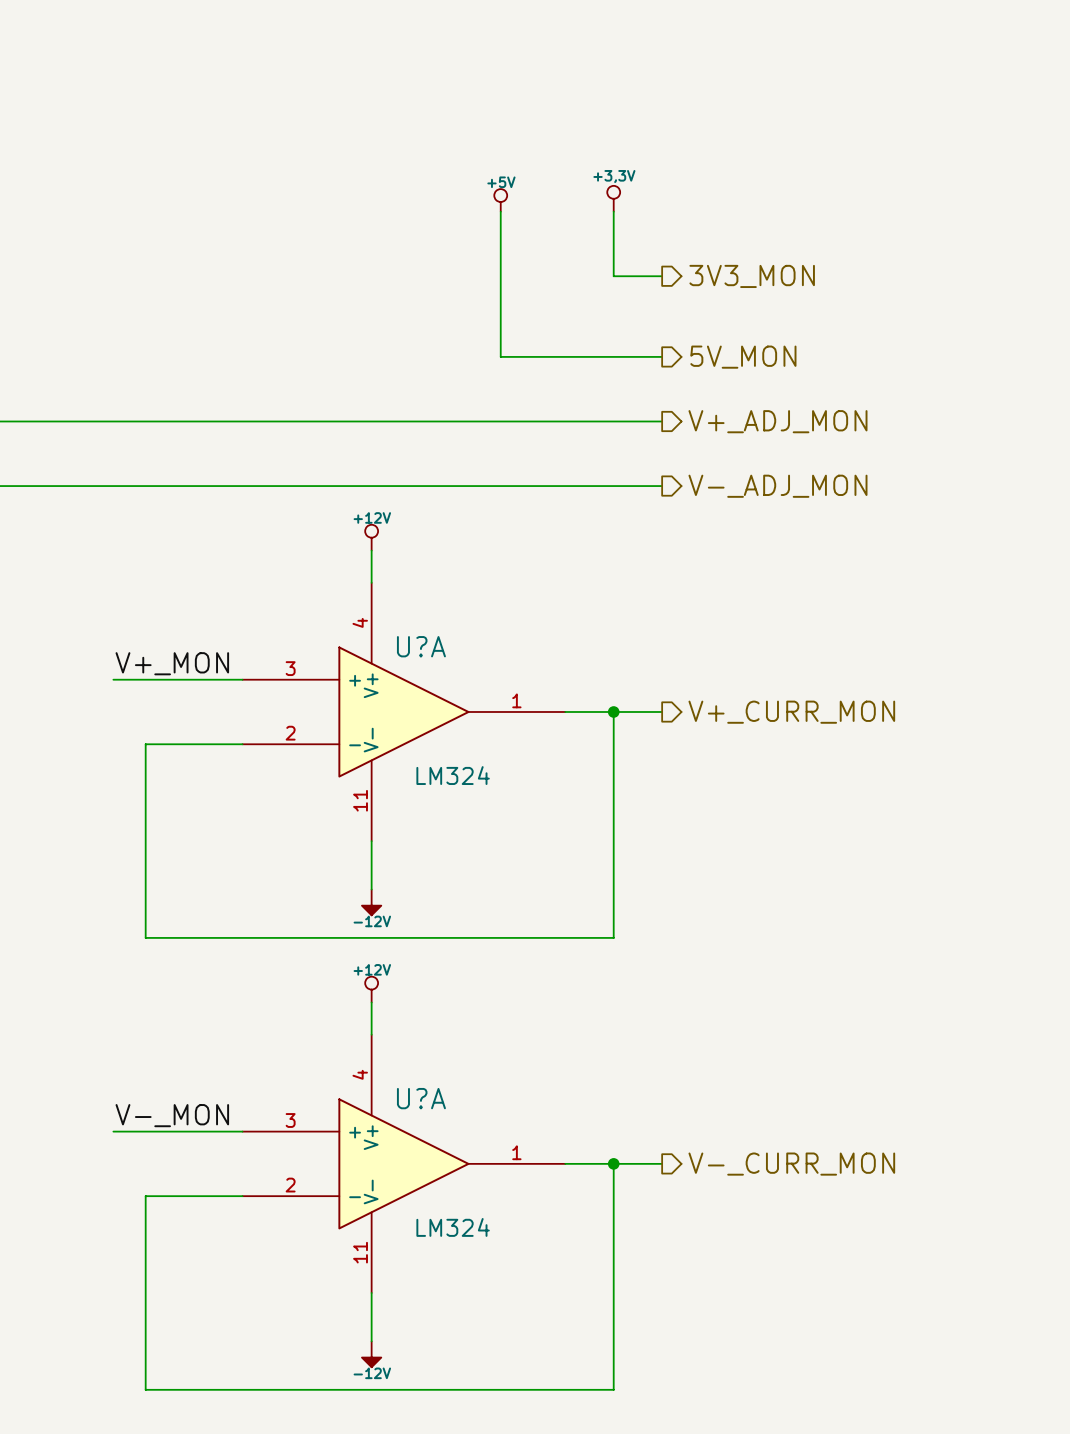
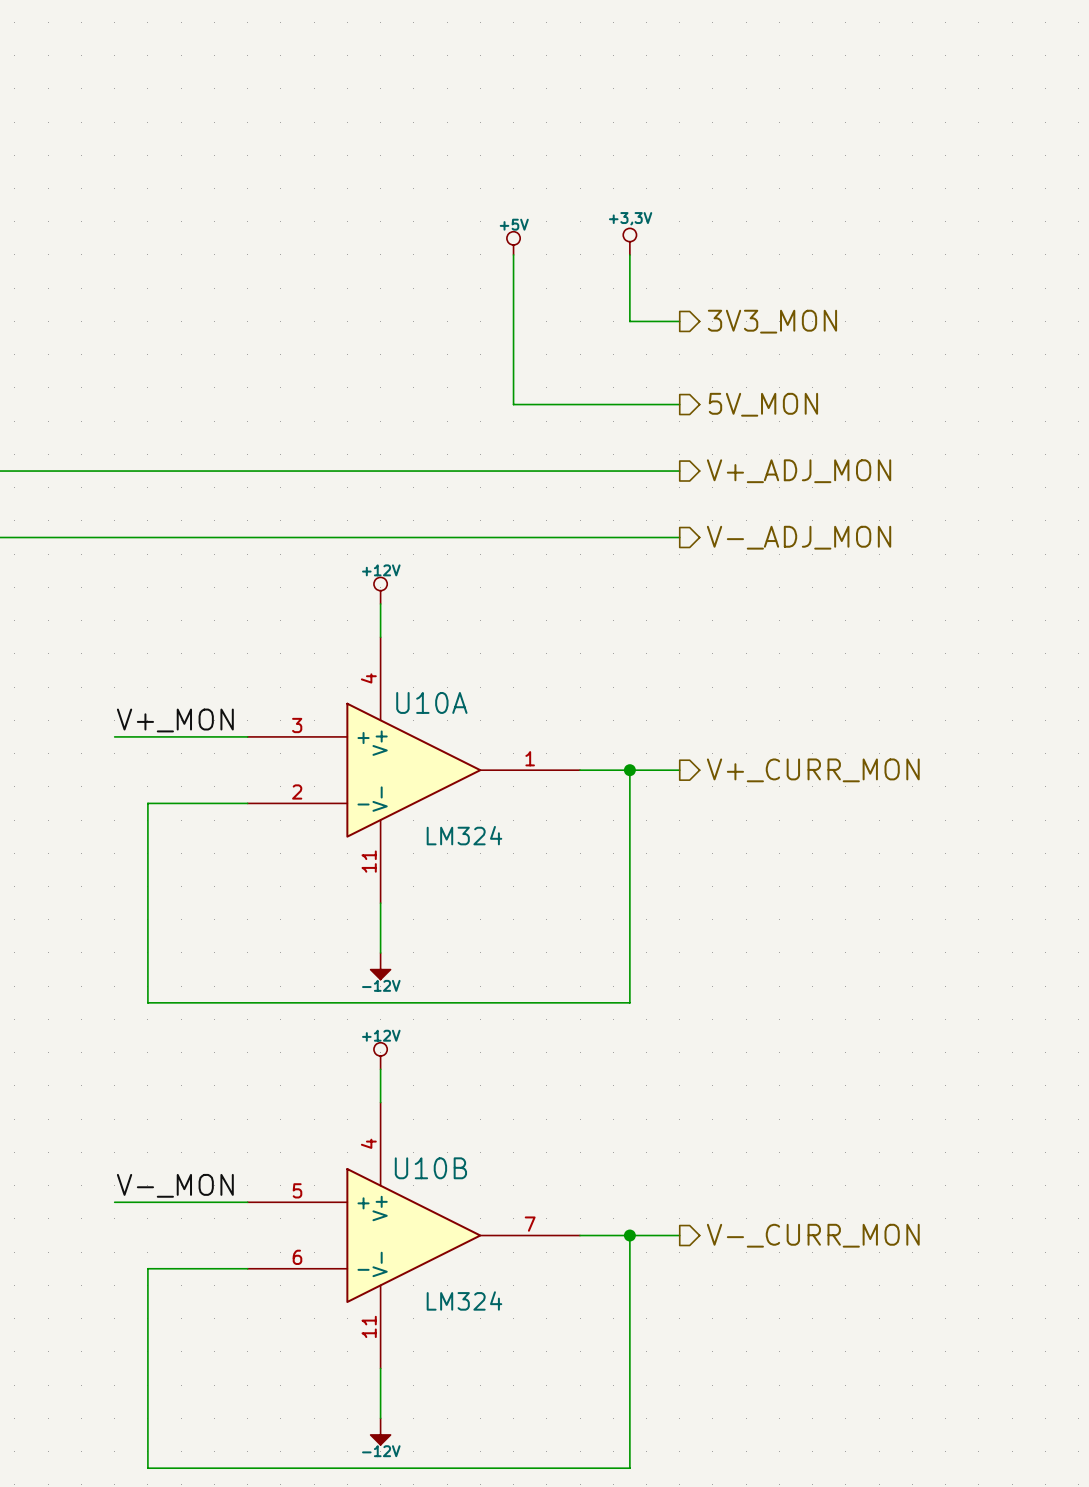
U?A name: U?A (421, 646) -> U10A (431, 702)
U?A name: U?A (421, 1098) -> U10B (430, 1168)
U?A pin number: 3 (290, 1120) -> 5 (297, 1190)
U?A pin number: 1 (516, 1152) -> 7 (530, 1224)
U?A pin number: 2 (290, 1185) -> 6 (297, 1257)

